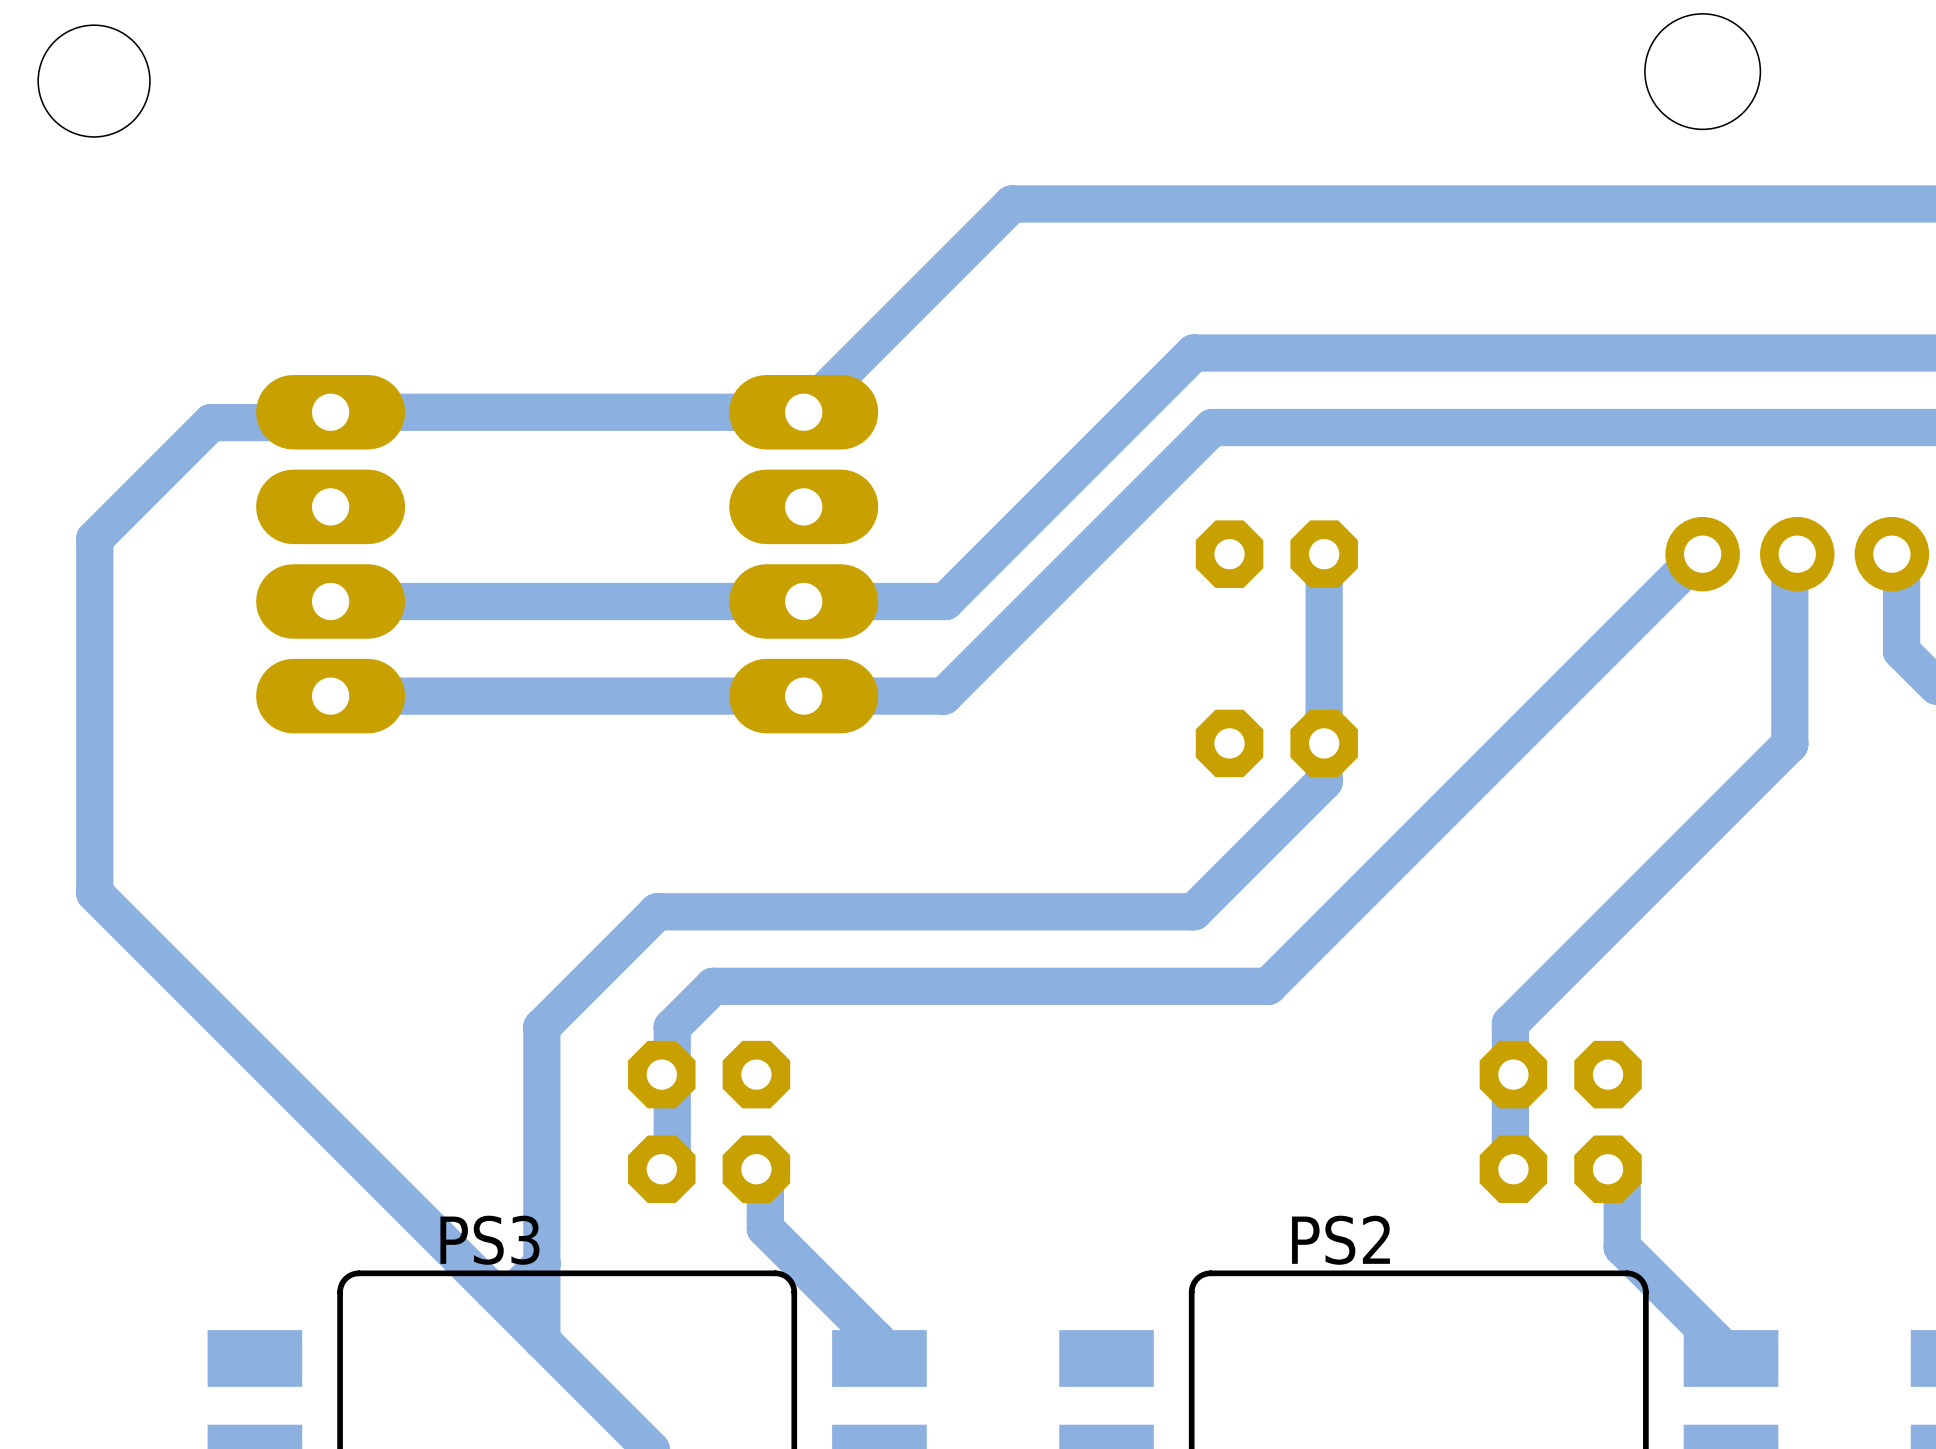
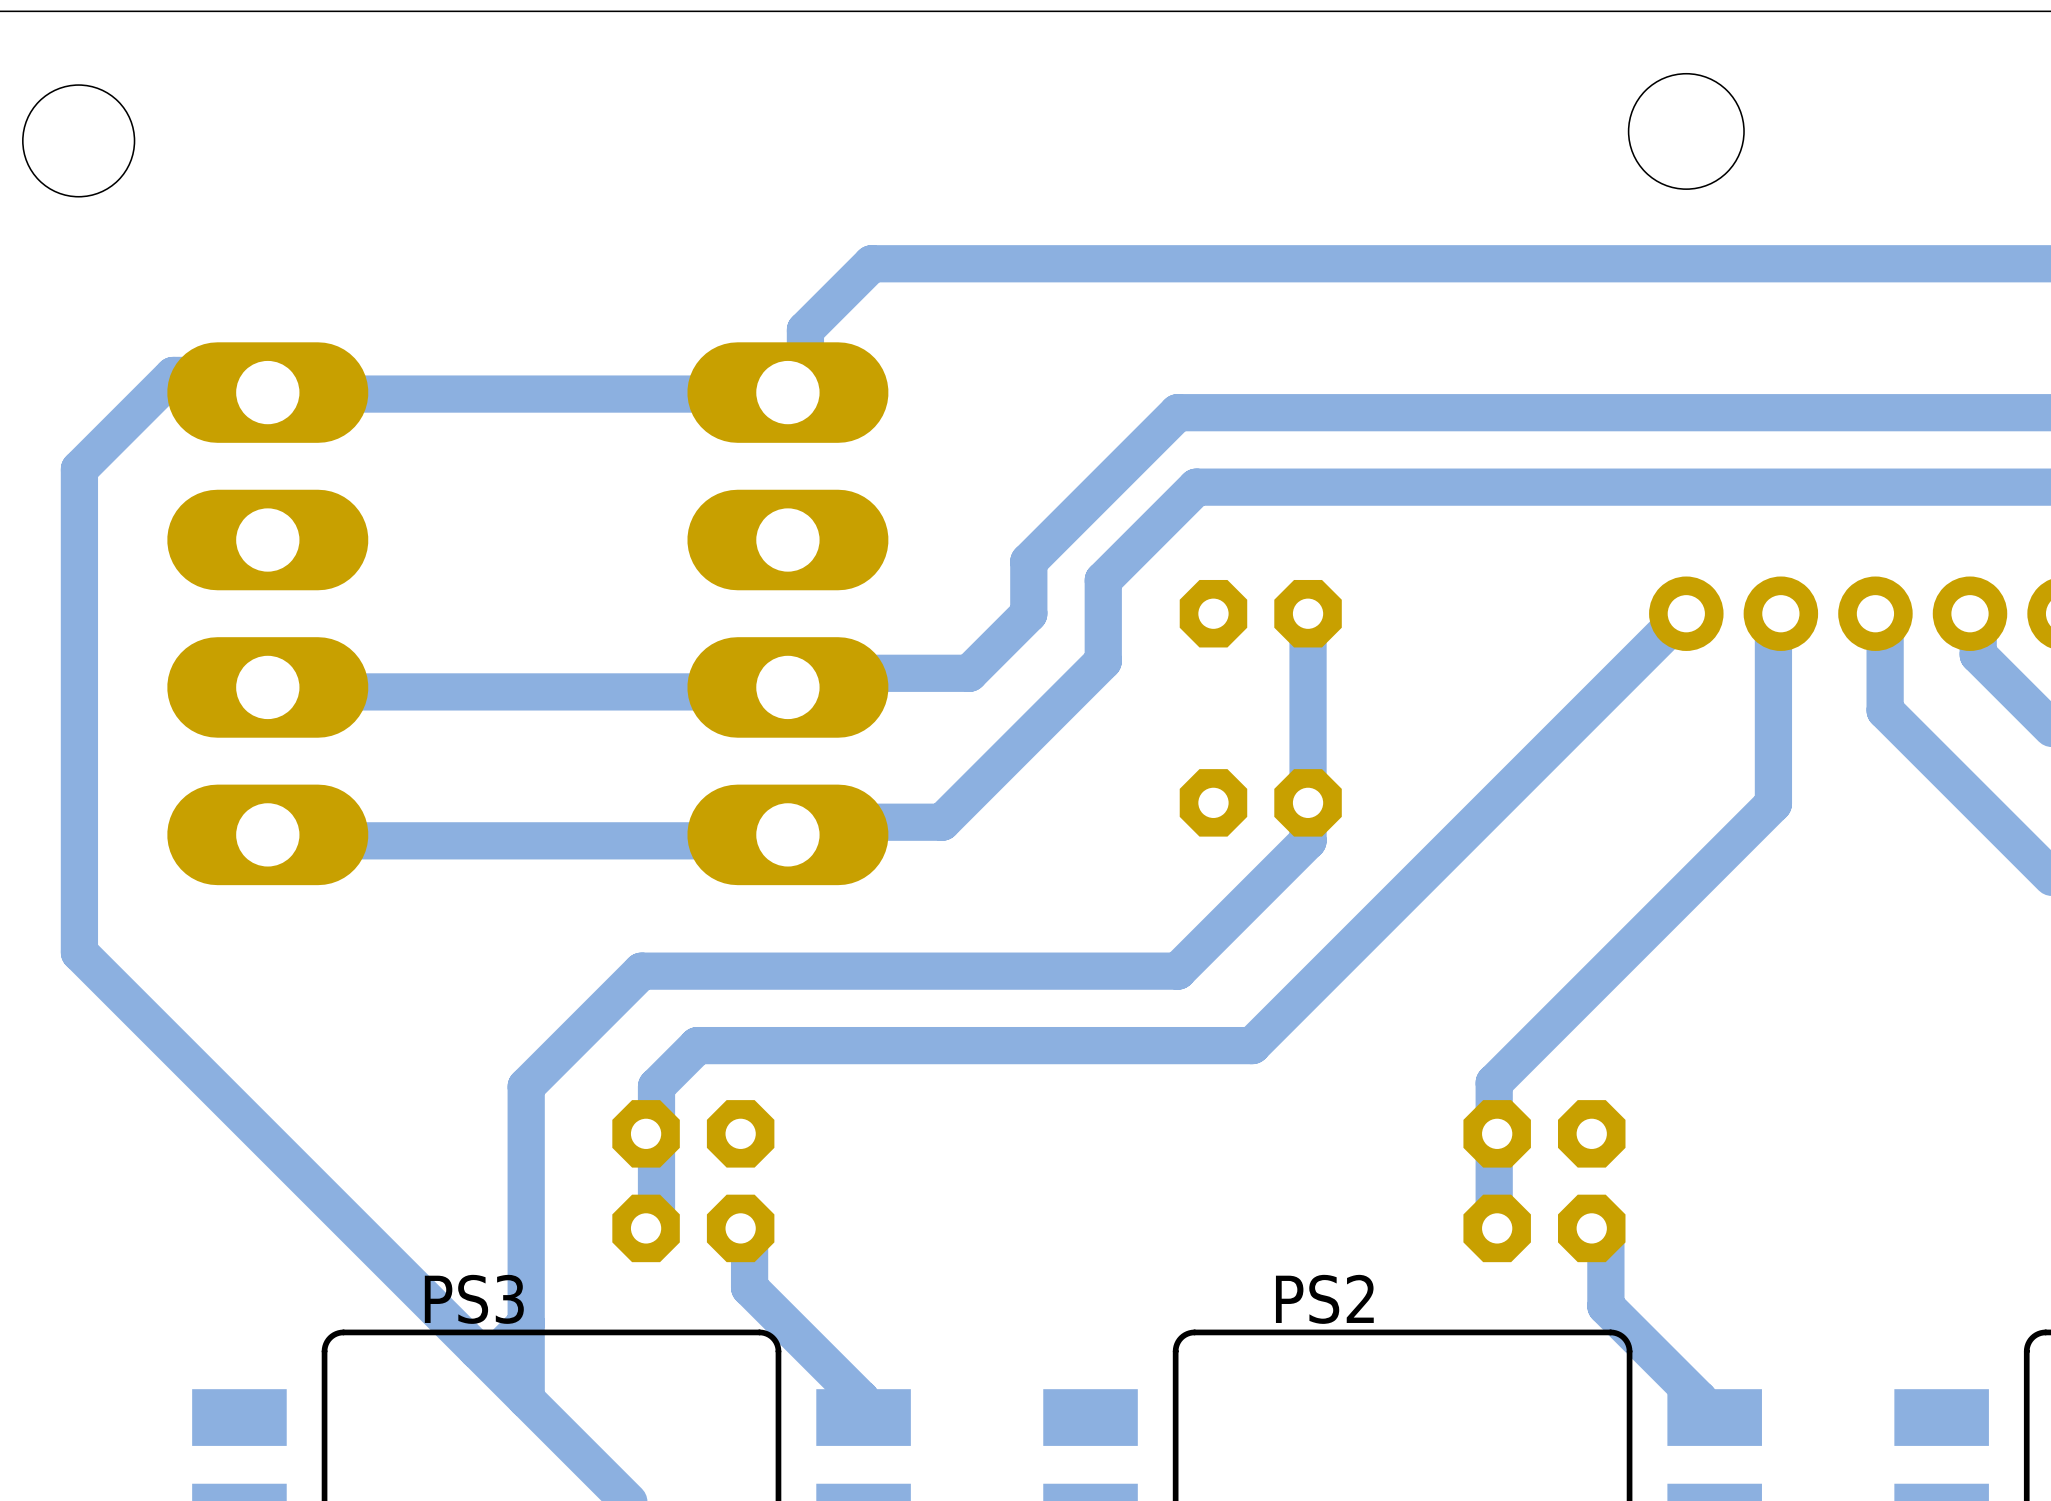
bottom track: (1011, 204) (803, 412) (330, 412) (272, 422) (211, 422) (94, 538) -> (996, 263) (871, 263) (805, 330) (805, 375) (786, 394) (284, 394) (267, 392) (265, 375) (173, 375) (79, 469) (79, 598)
part footprint: [729, 374, 879, 734] -> [687, 342, 889, 886]
bottom track: (1044, 502) (945, 601) (330, 601) -> (1028, 561) (1028, 613) (969, 673) (805, 673) (787, 687) (786, 691) (284, 691) (267, 687)
bottom track: (1119, 520) (943, 696) (330, 696) -> (1103, 580) (1103, 661) (942, 822) (805, 822) (787, 834) (786, 840) (284, 840) (267, 834)
part: none -> (267, 613)
part: (330, 554) -> none

